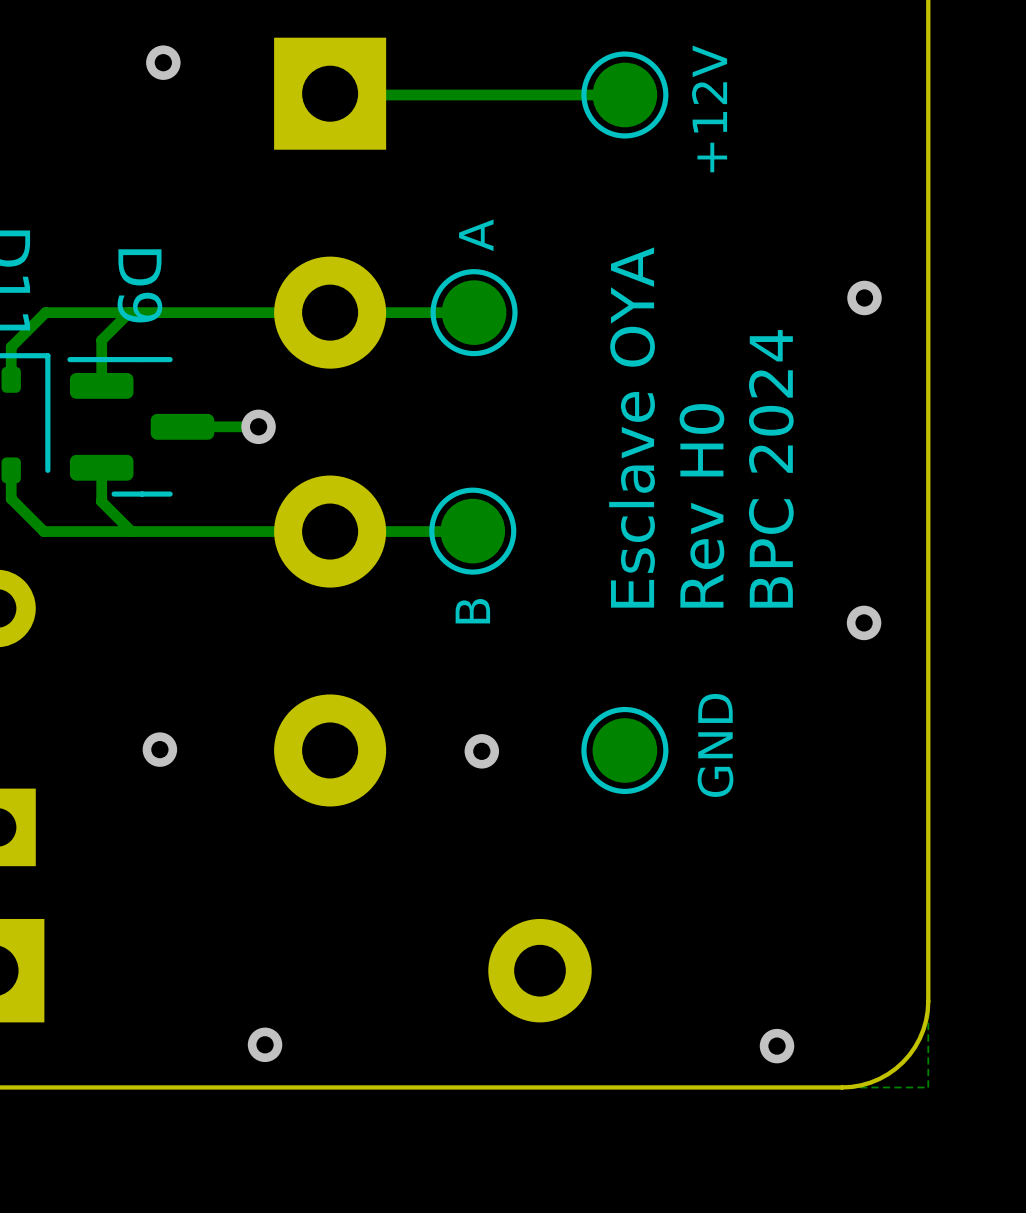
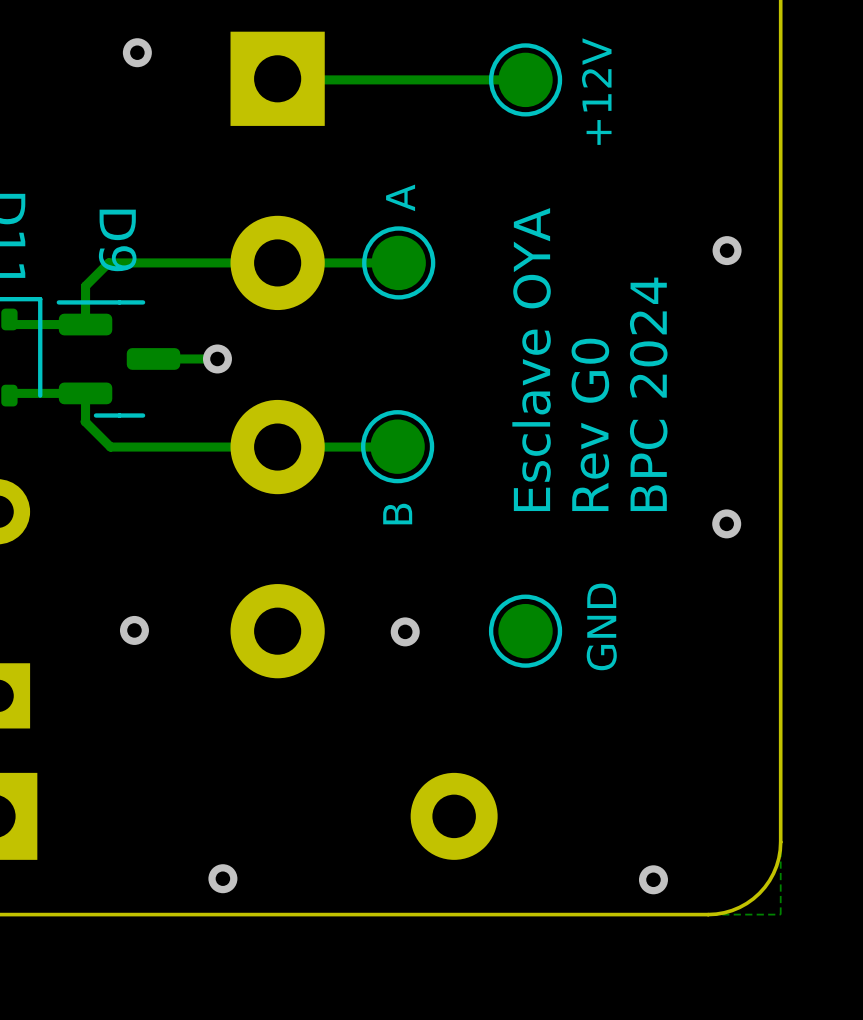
track: (129, 312) (45, 312) (11, 347) (11, 379) -> (85, 324) (14, 324) (9, 319)
track: (11, 470) (11, 498) (43, 531) (131, 531) -> (9, 395) (11, 393) (85, 393)
text: Rev H0 (701, 505) -> Rev G0 (590, 424)

